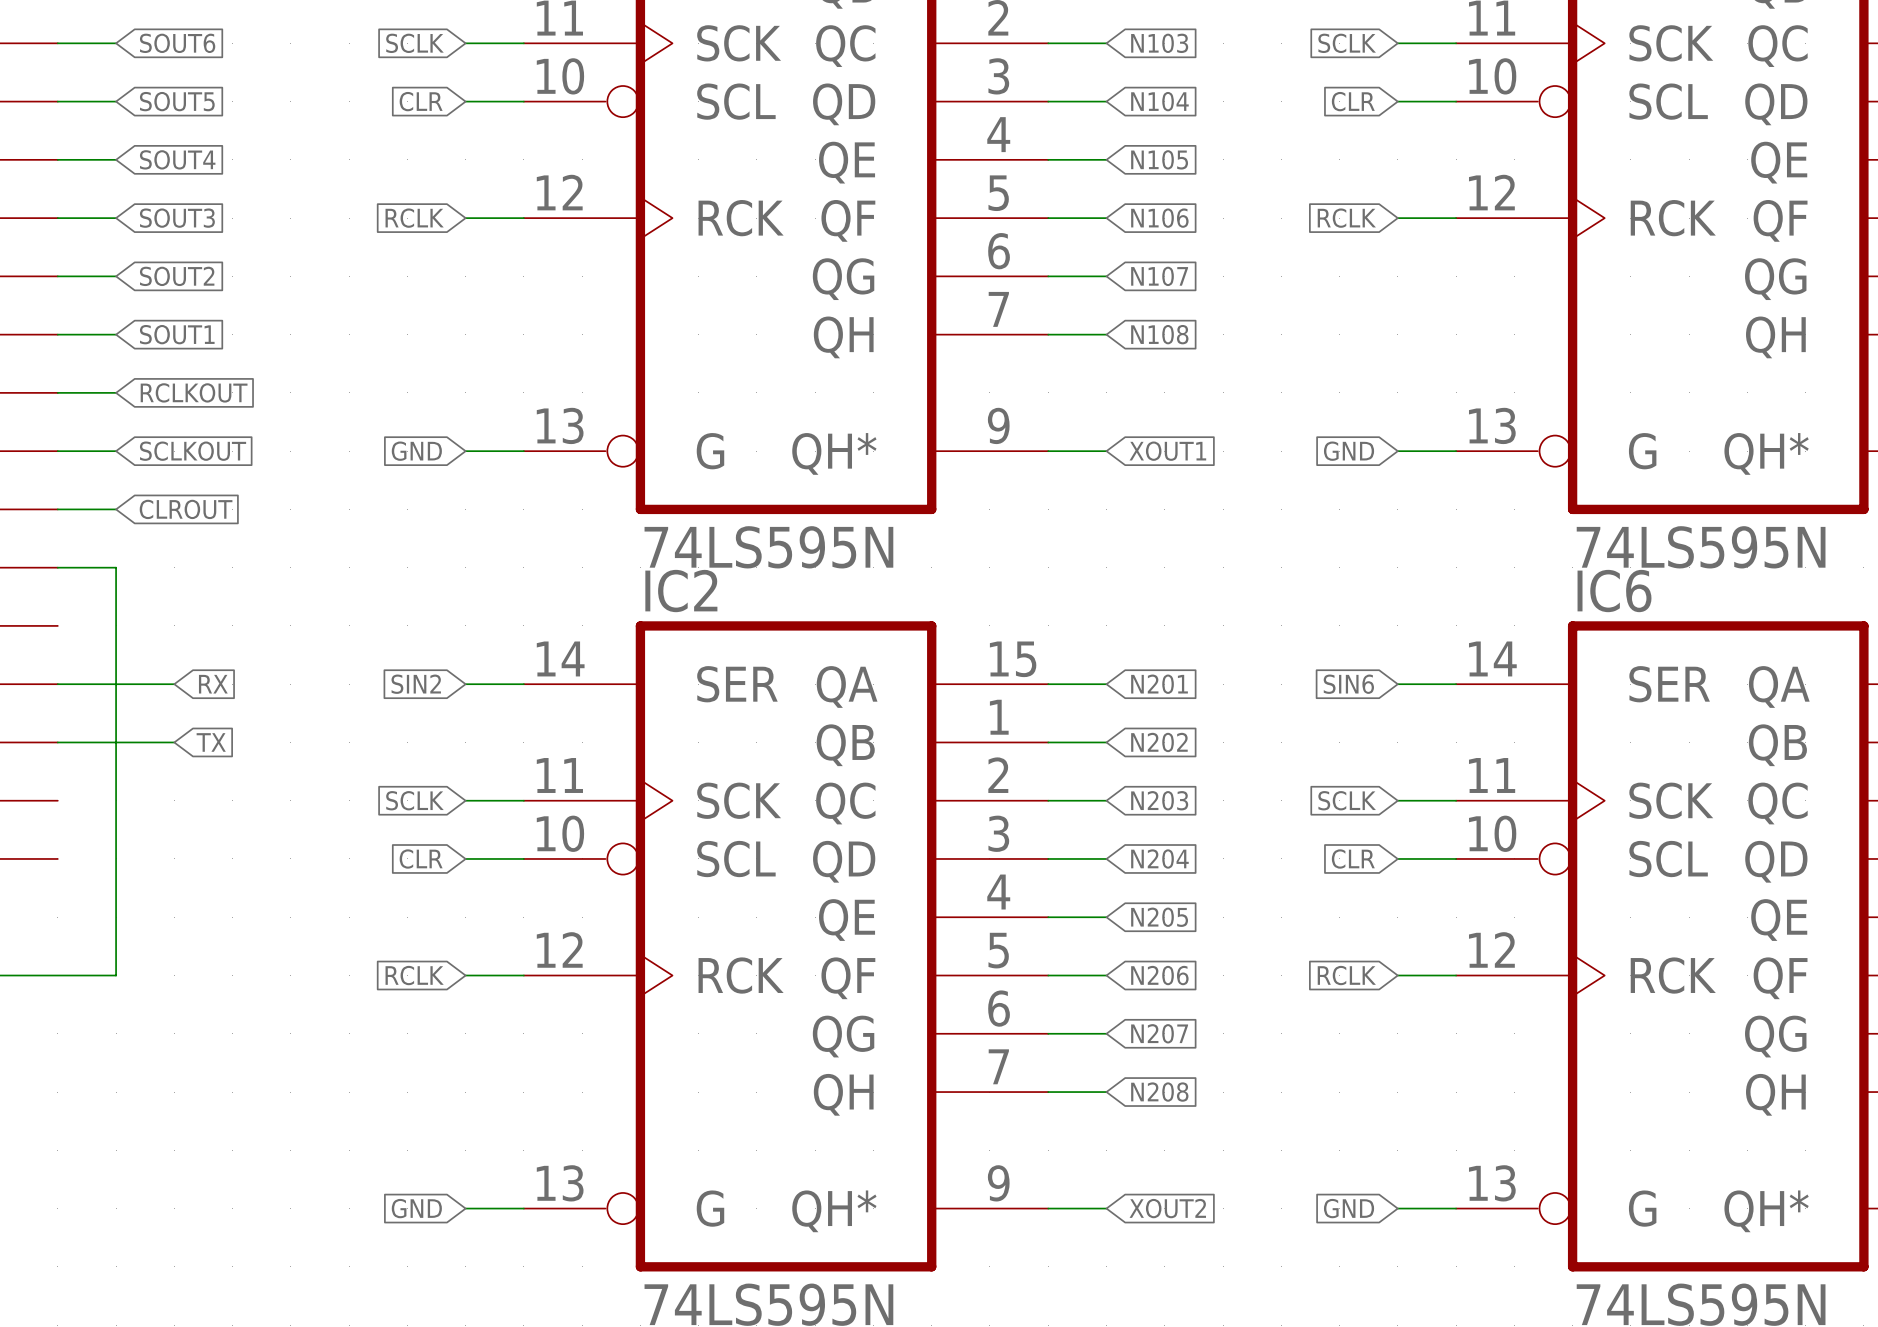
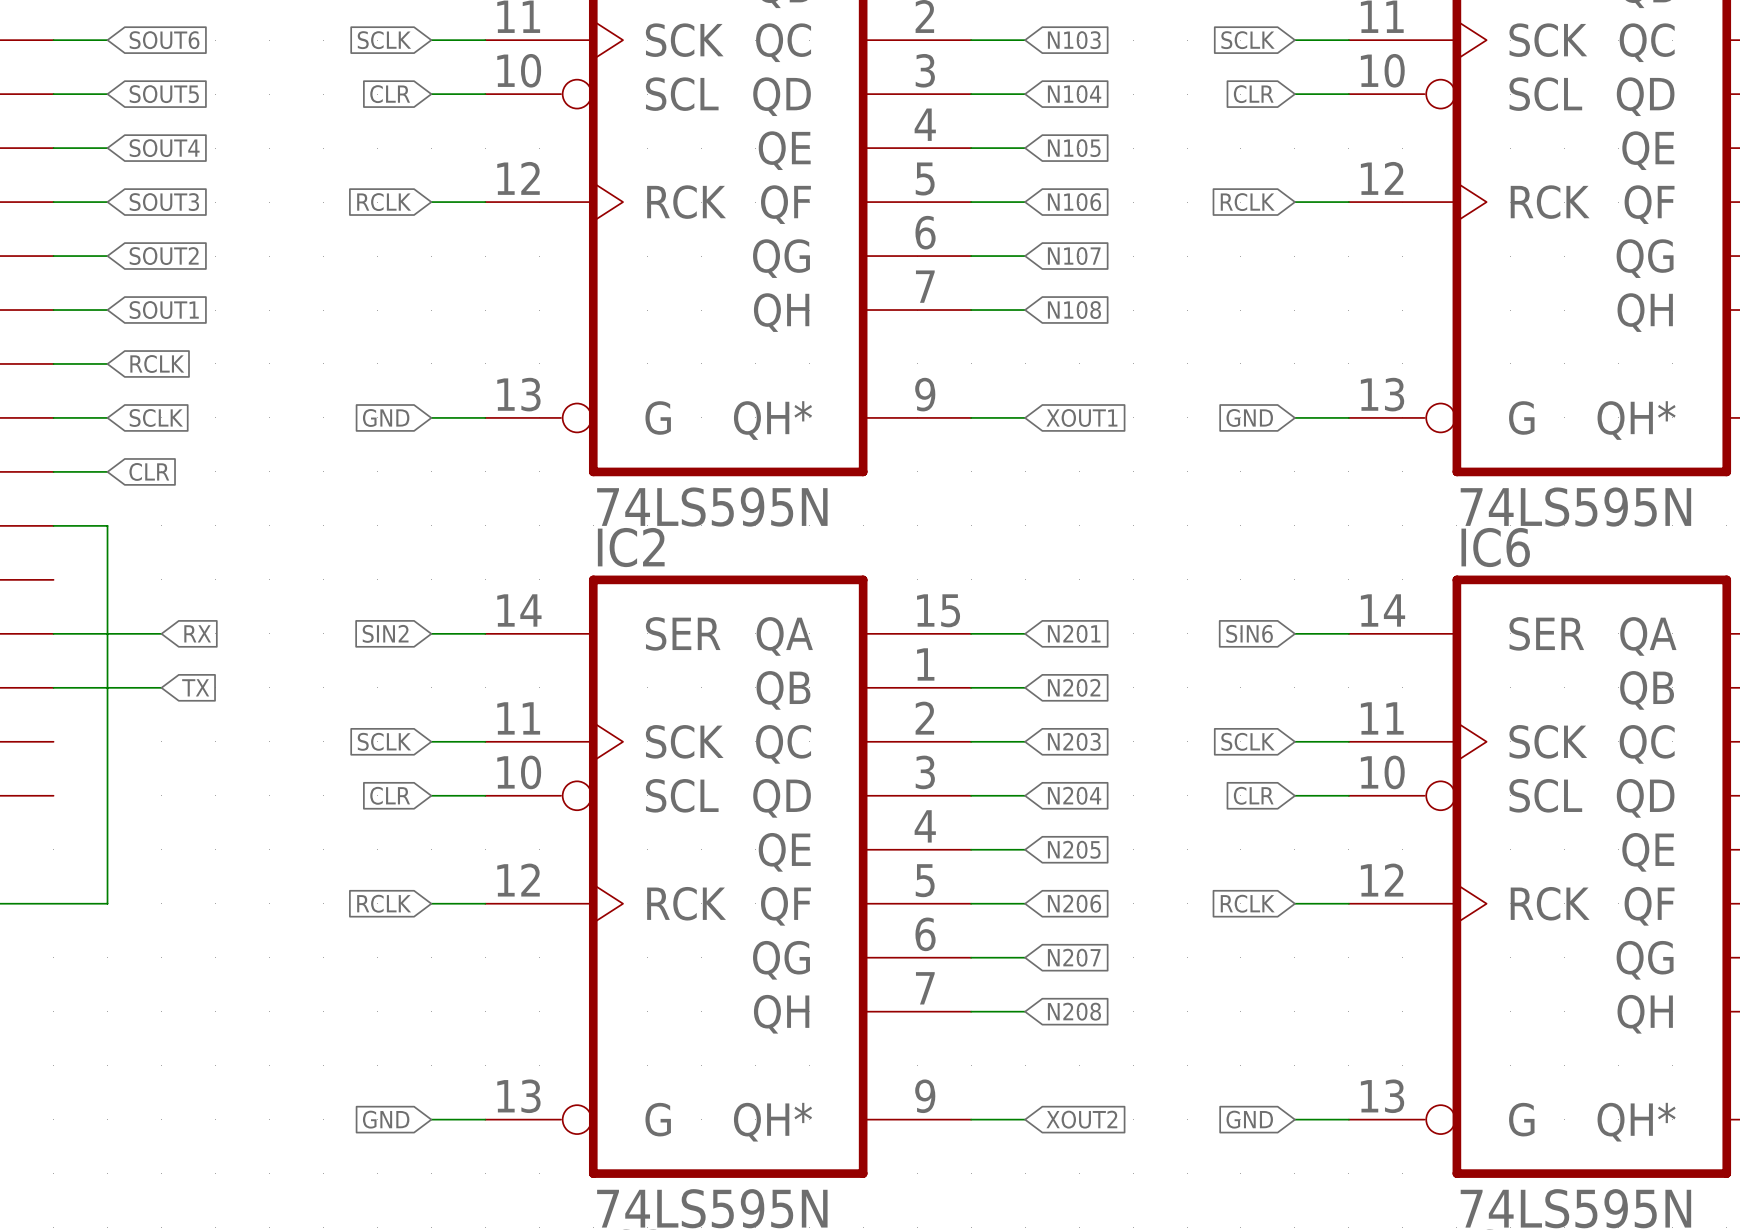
global label: RCLKOUT (194, 392) -> RCLK (157, 363)
global label: SCLKOUT (193, 451) -> SCLK (156, 417)
global label: CLROUT (186, 509) -> CLR (149, 471)

